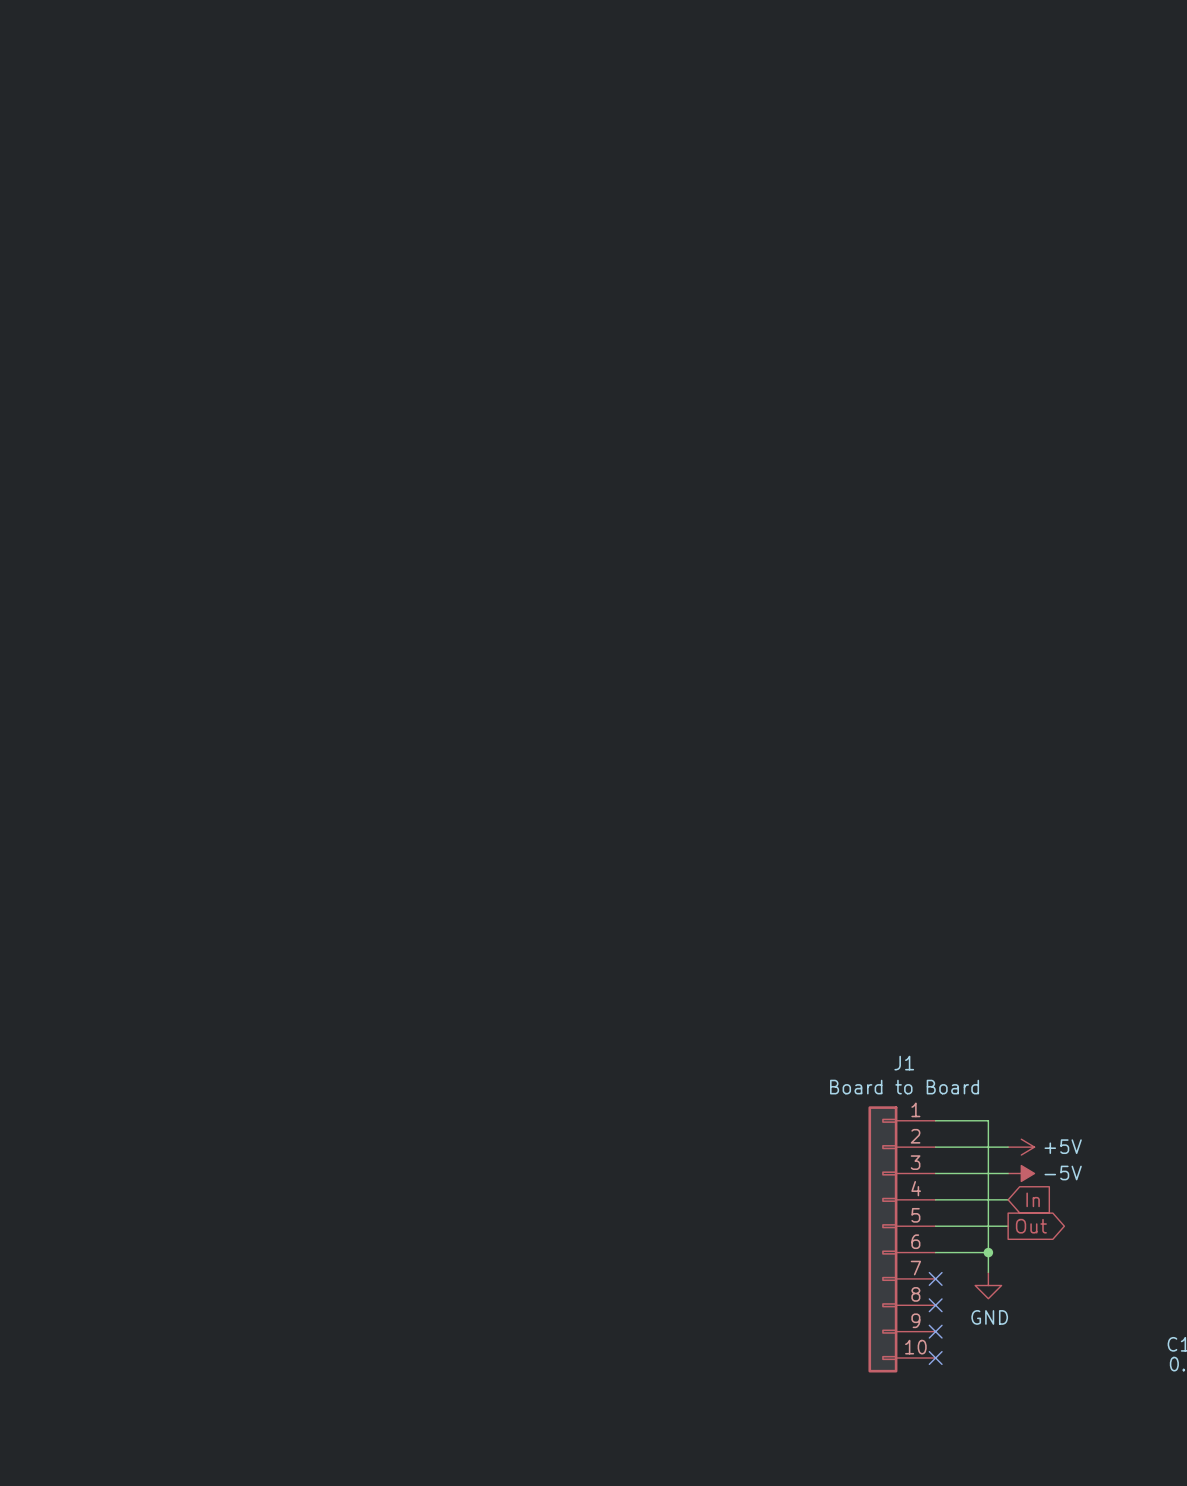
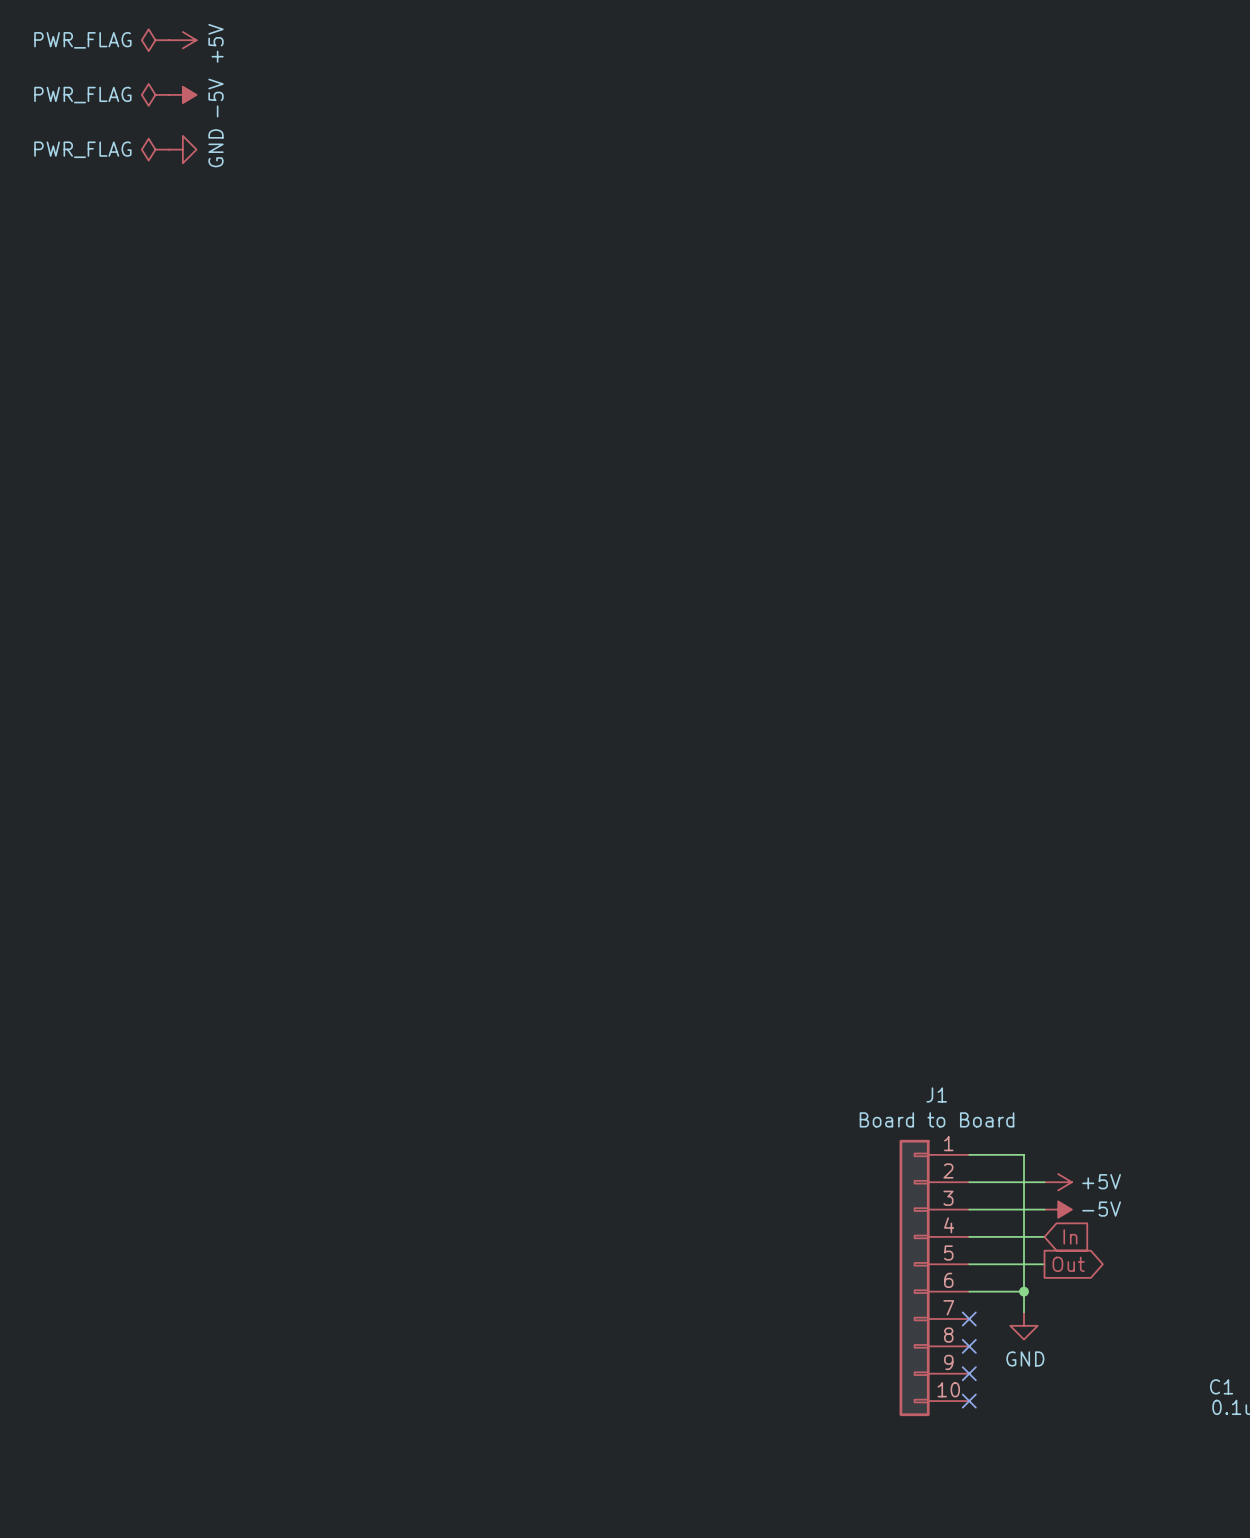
power symbol: none -> PWR_FLAG (155, 40)
power symbol: none -> +5V (182, 40)
power symbol: none -> PWR_FLAG (155, 94)
power symbol: none -> -5V (182, 94)
power symbol: none -> PWR_FLAG (155, 149)
power symbol: none -> GND (182, 149)

